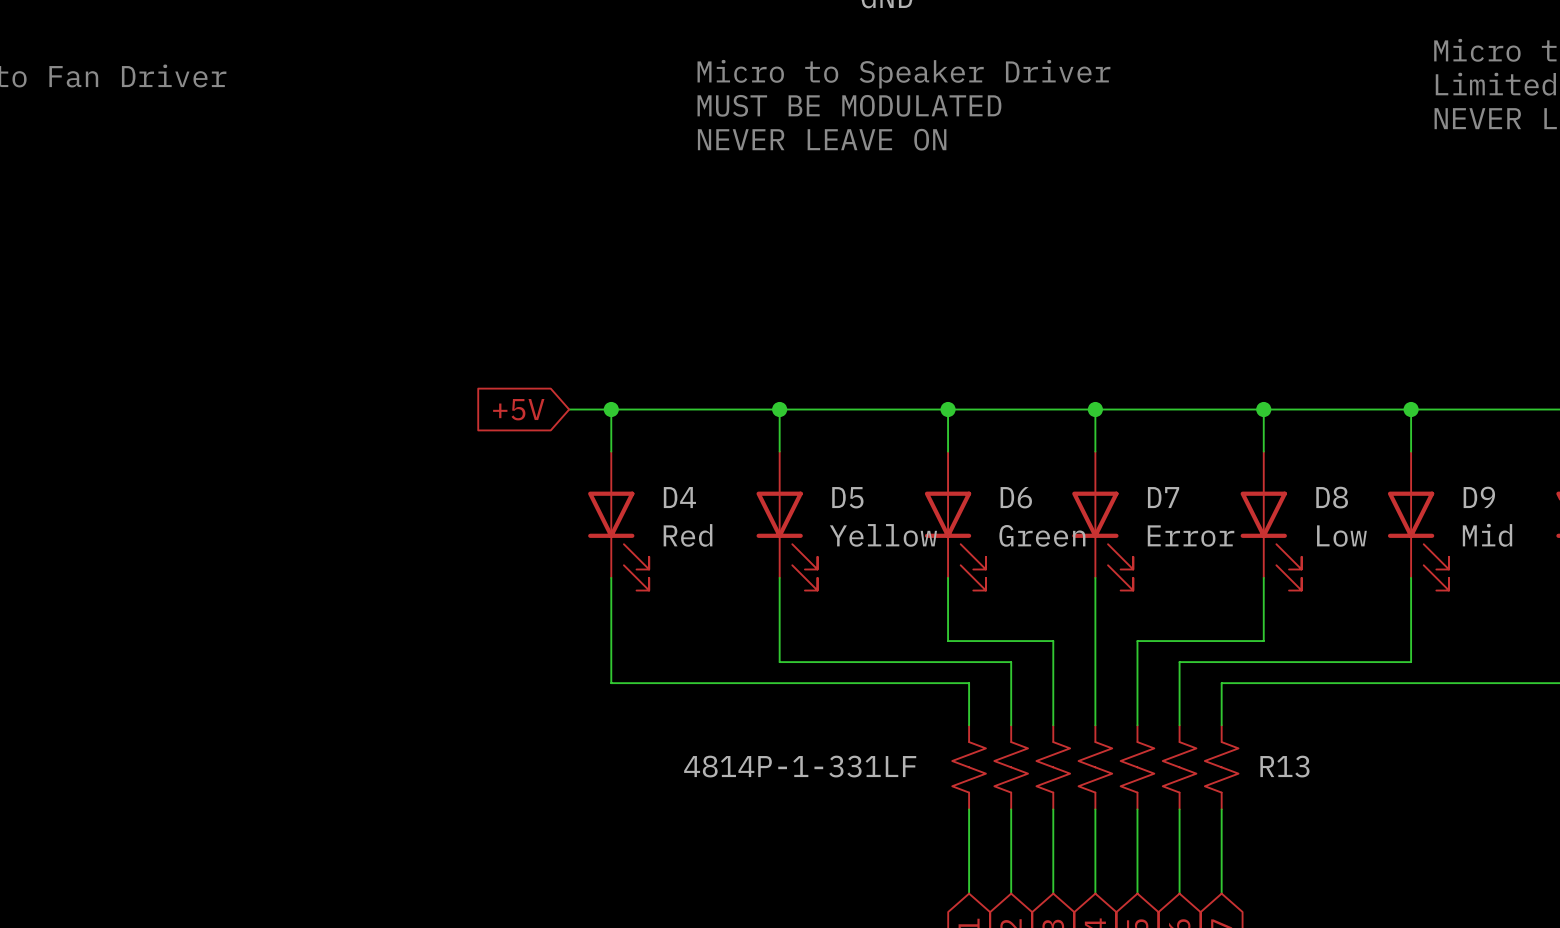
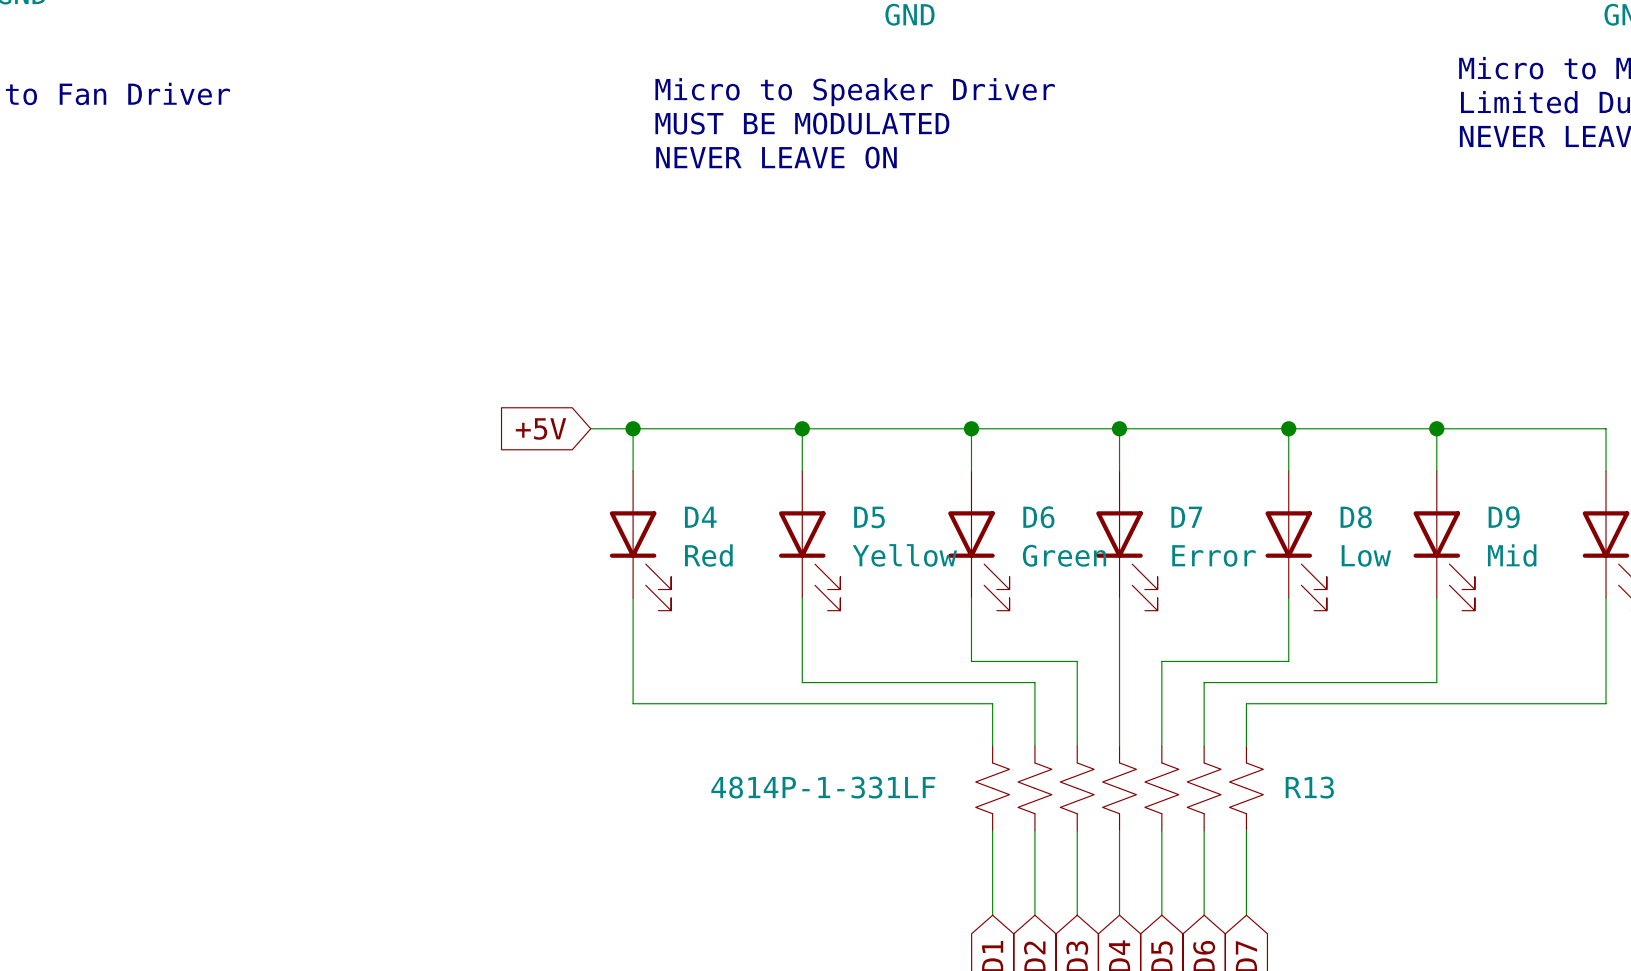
text position: Micro to Speaker Driver (903, 74) -> Micro to Speaker Driver (855, 92)
text position: MUST BE MODULATED (849, 105) -> MUST BE MODULATED (802, 123)
text position: NEVER LEAVE ON (822, 139) -> NEVER LEAVE ON (776, 157)

